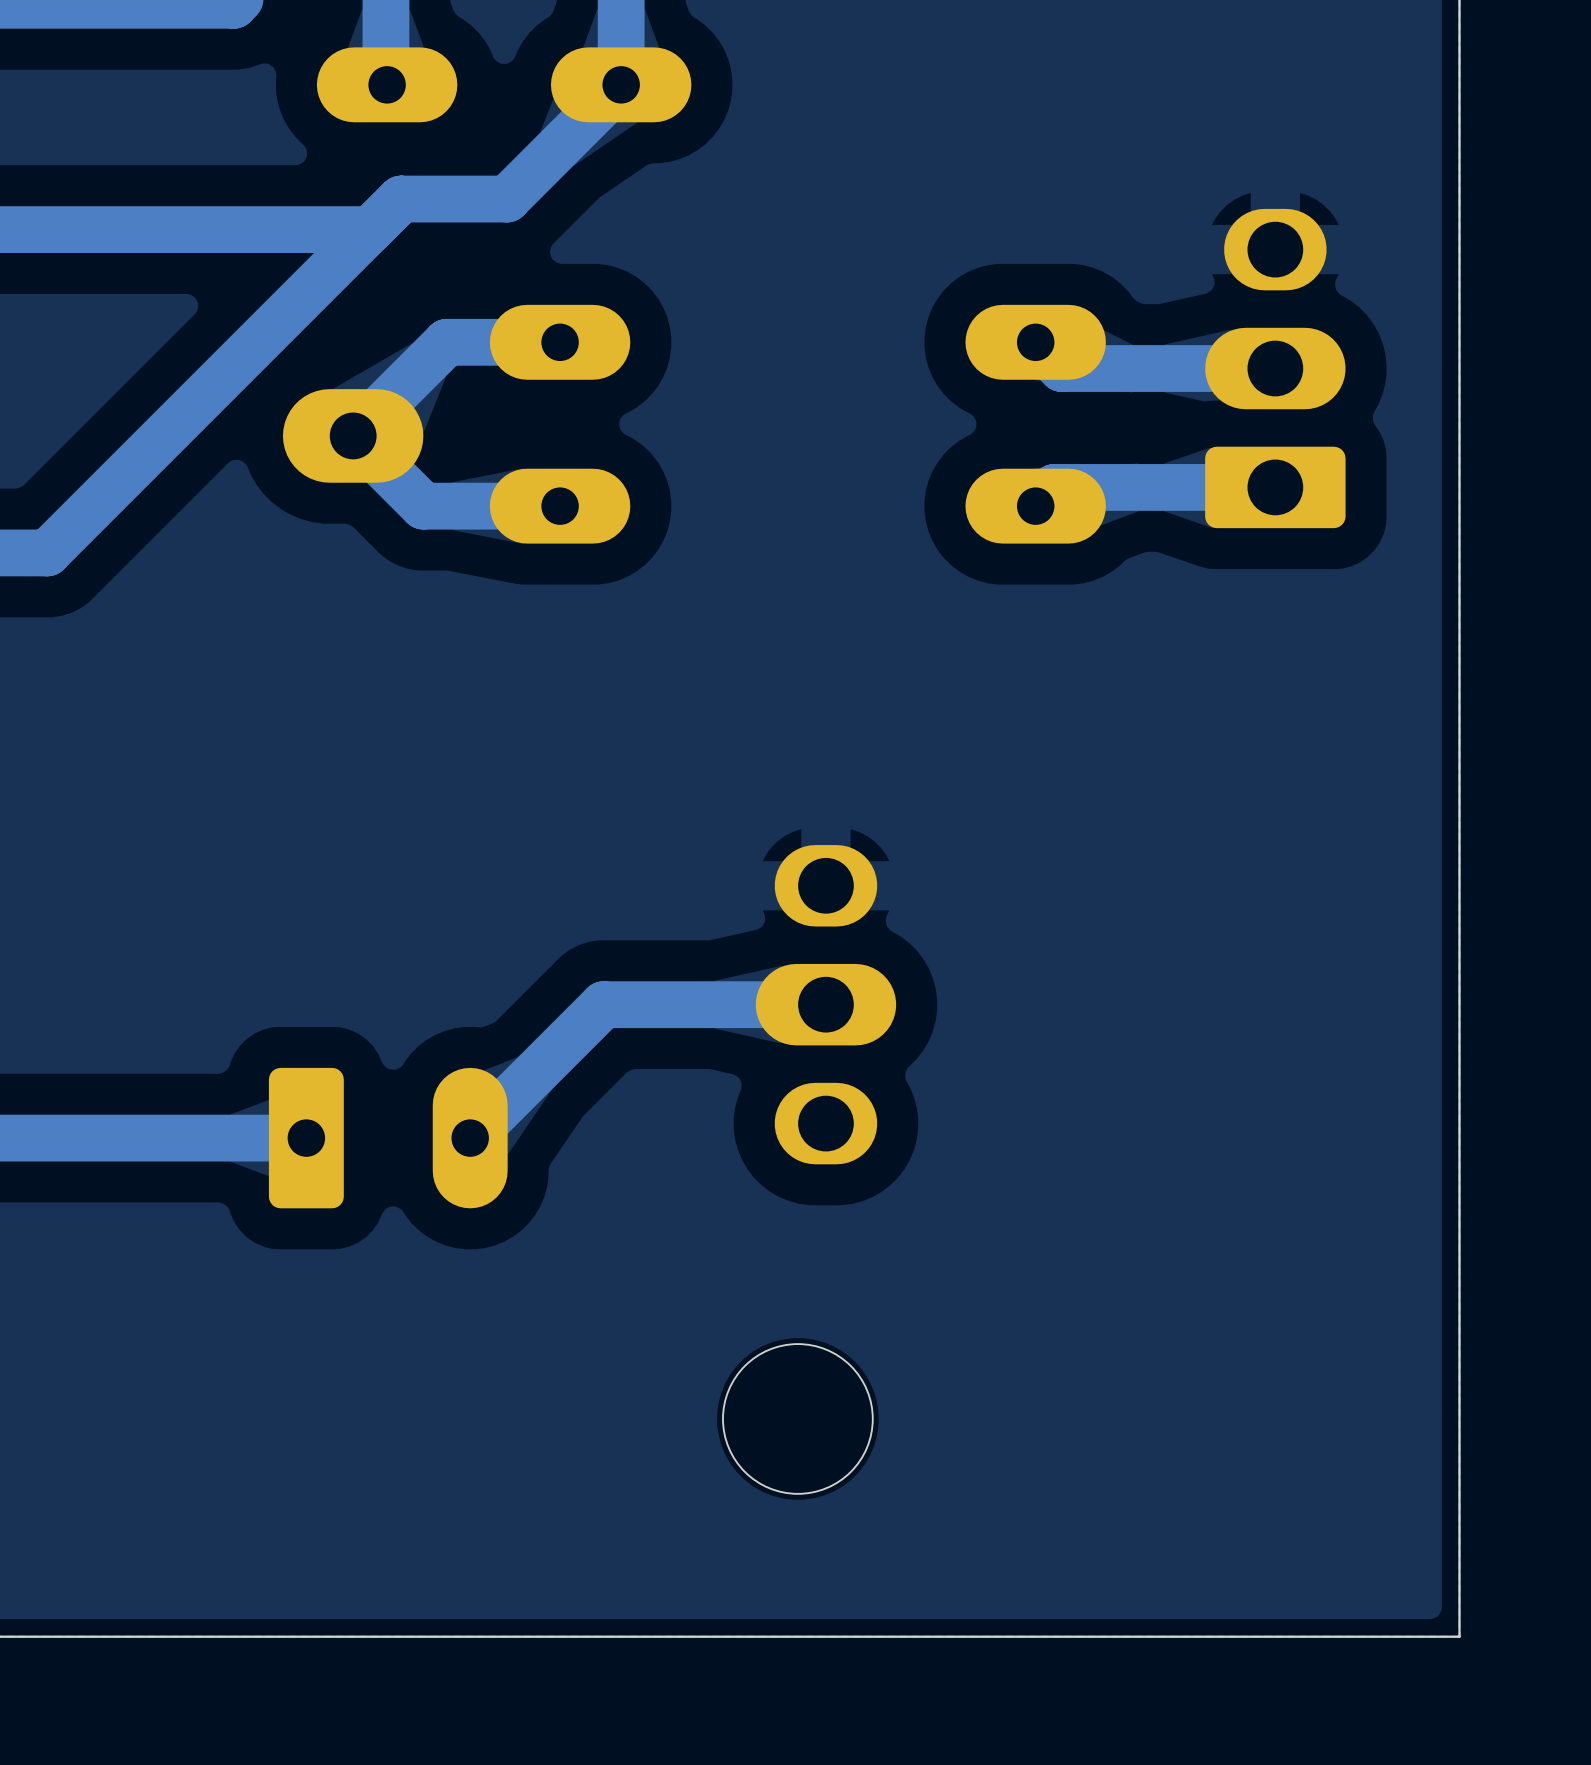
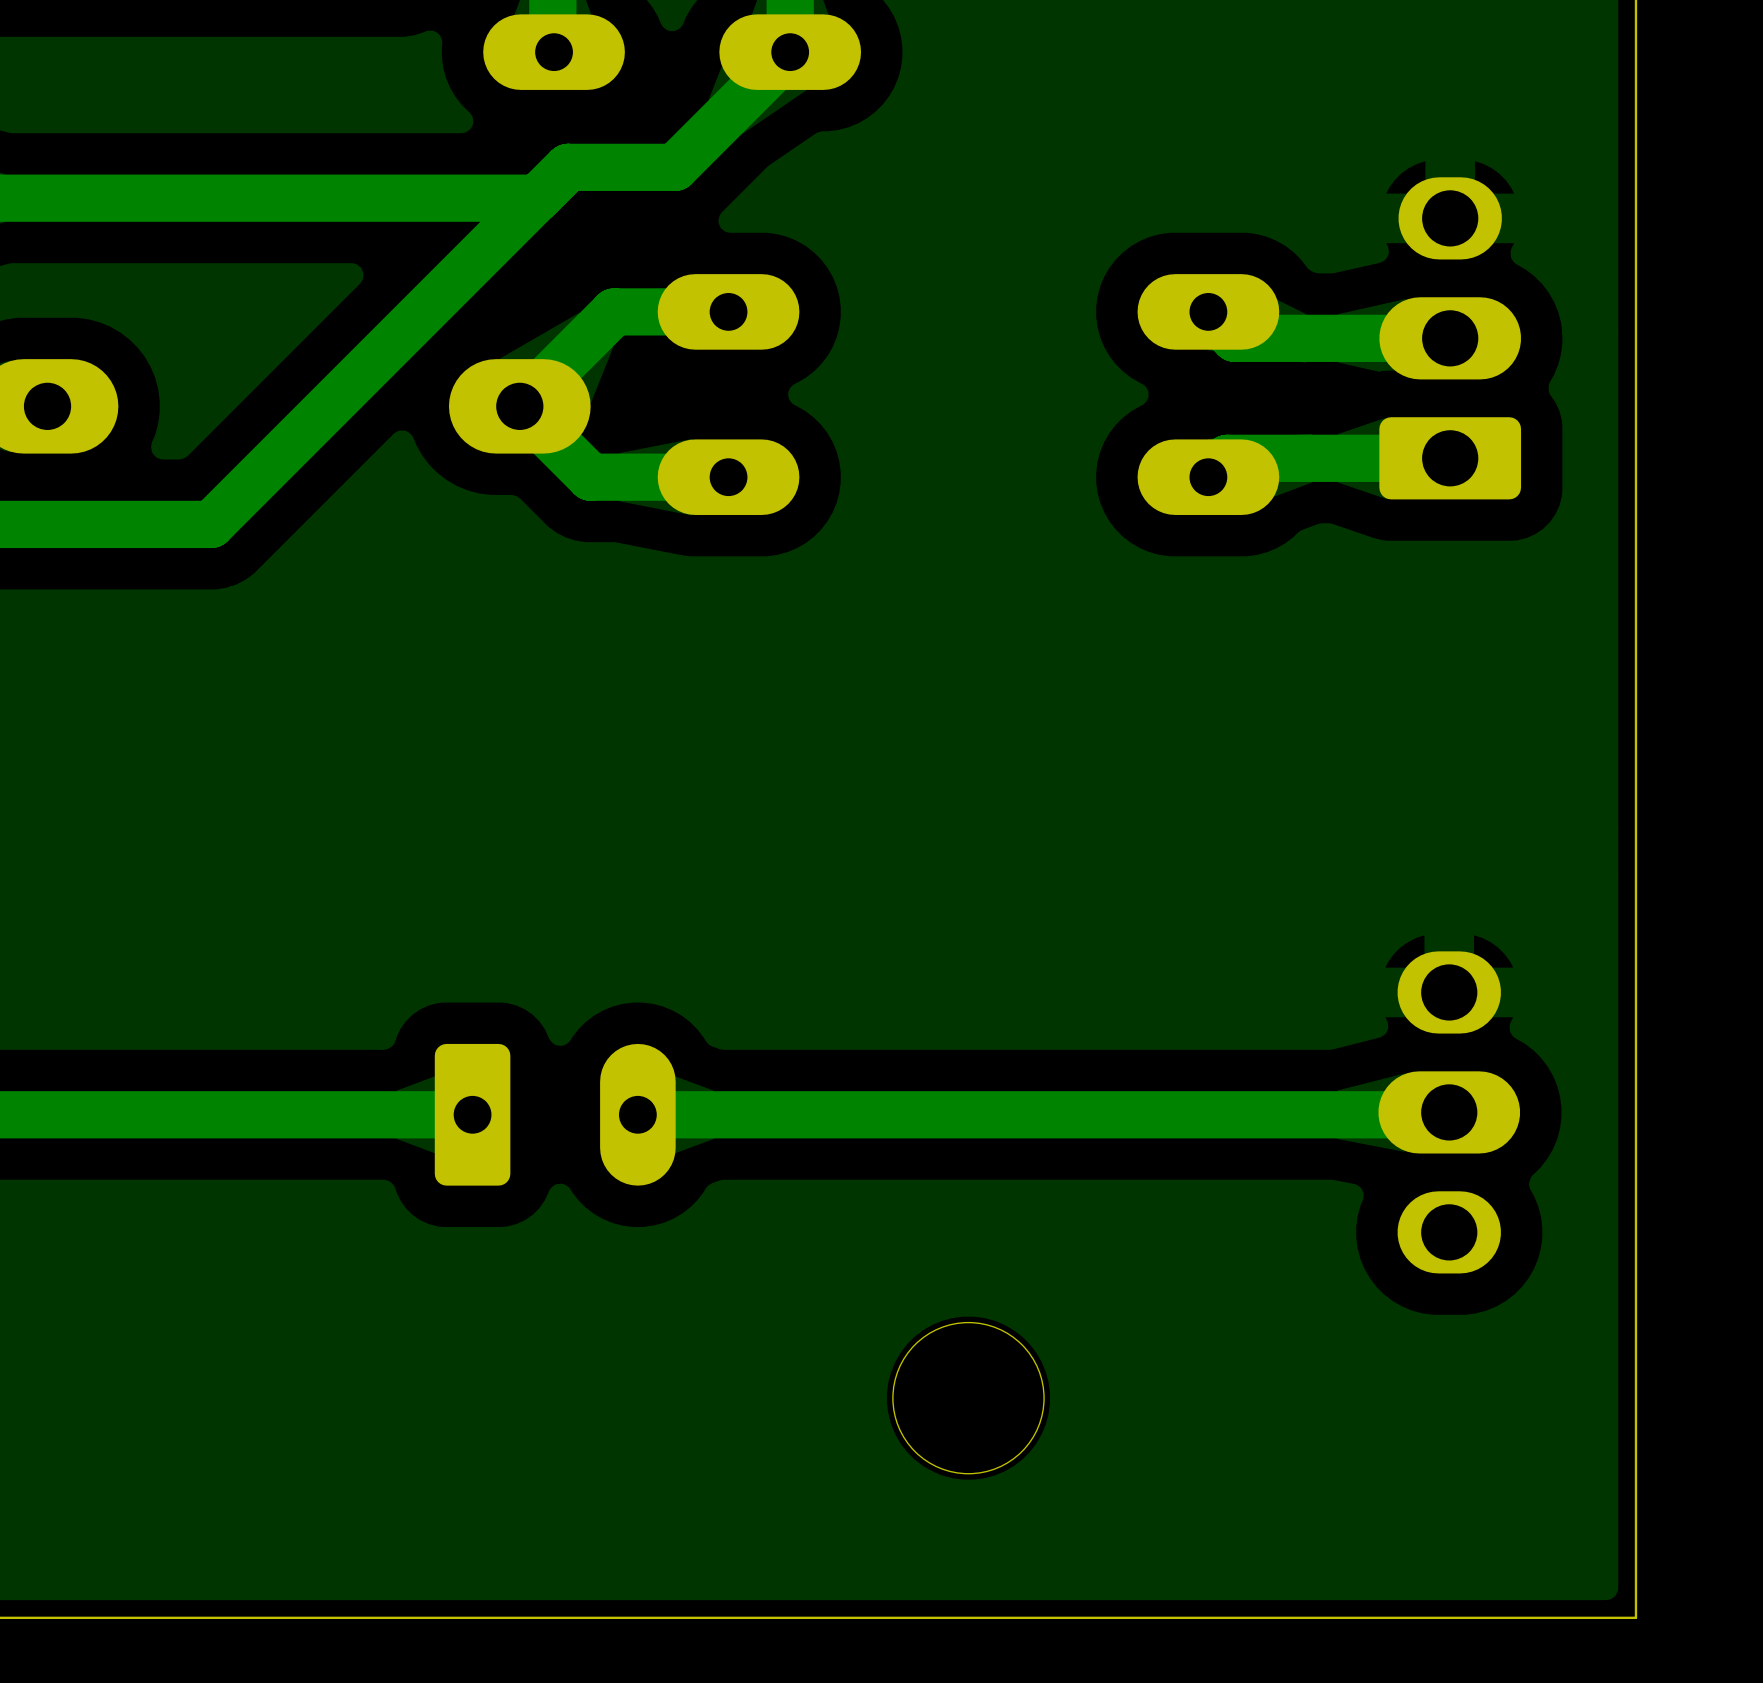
part position: (825, 1004) -> (1449, 1112)
track: (823, 1007) (825, 1004) (603, 1004) (470, 1138) -> (1449, 1112) (1446, 1114) (637, 1114)

